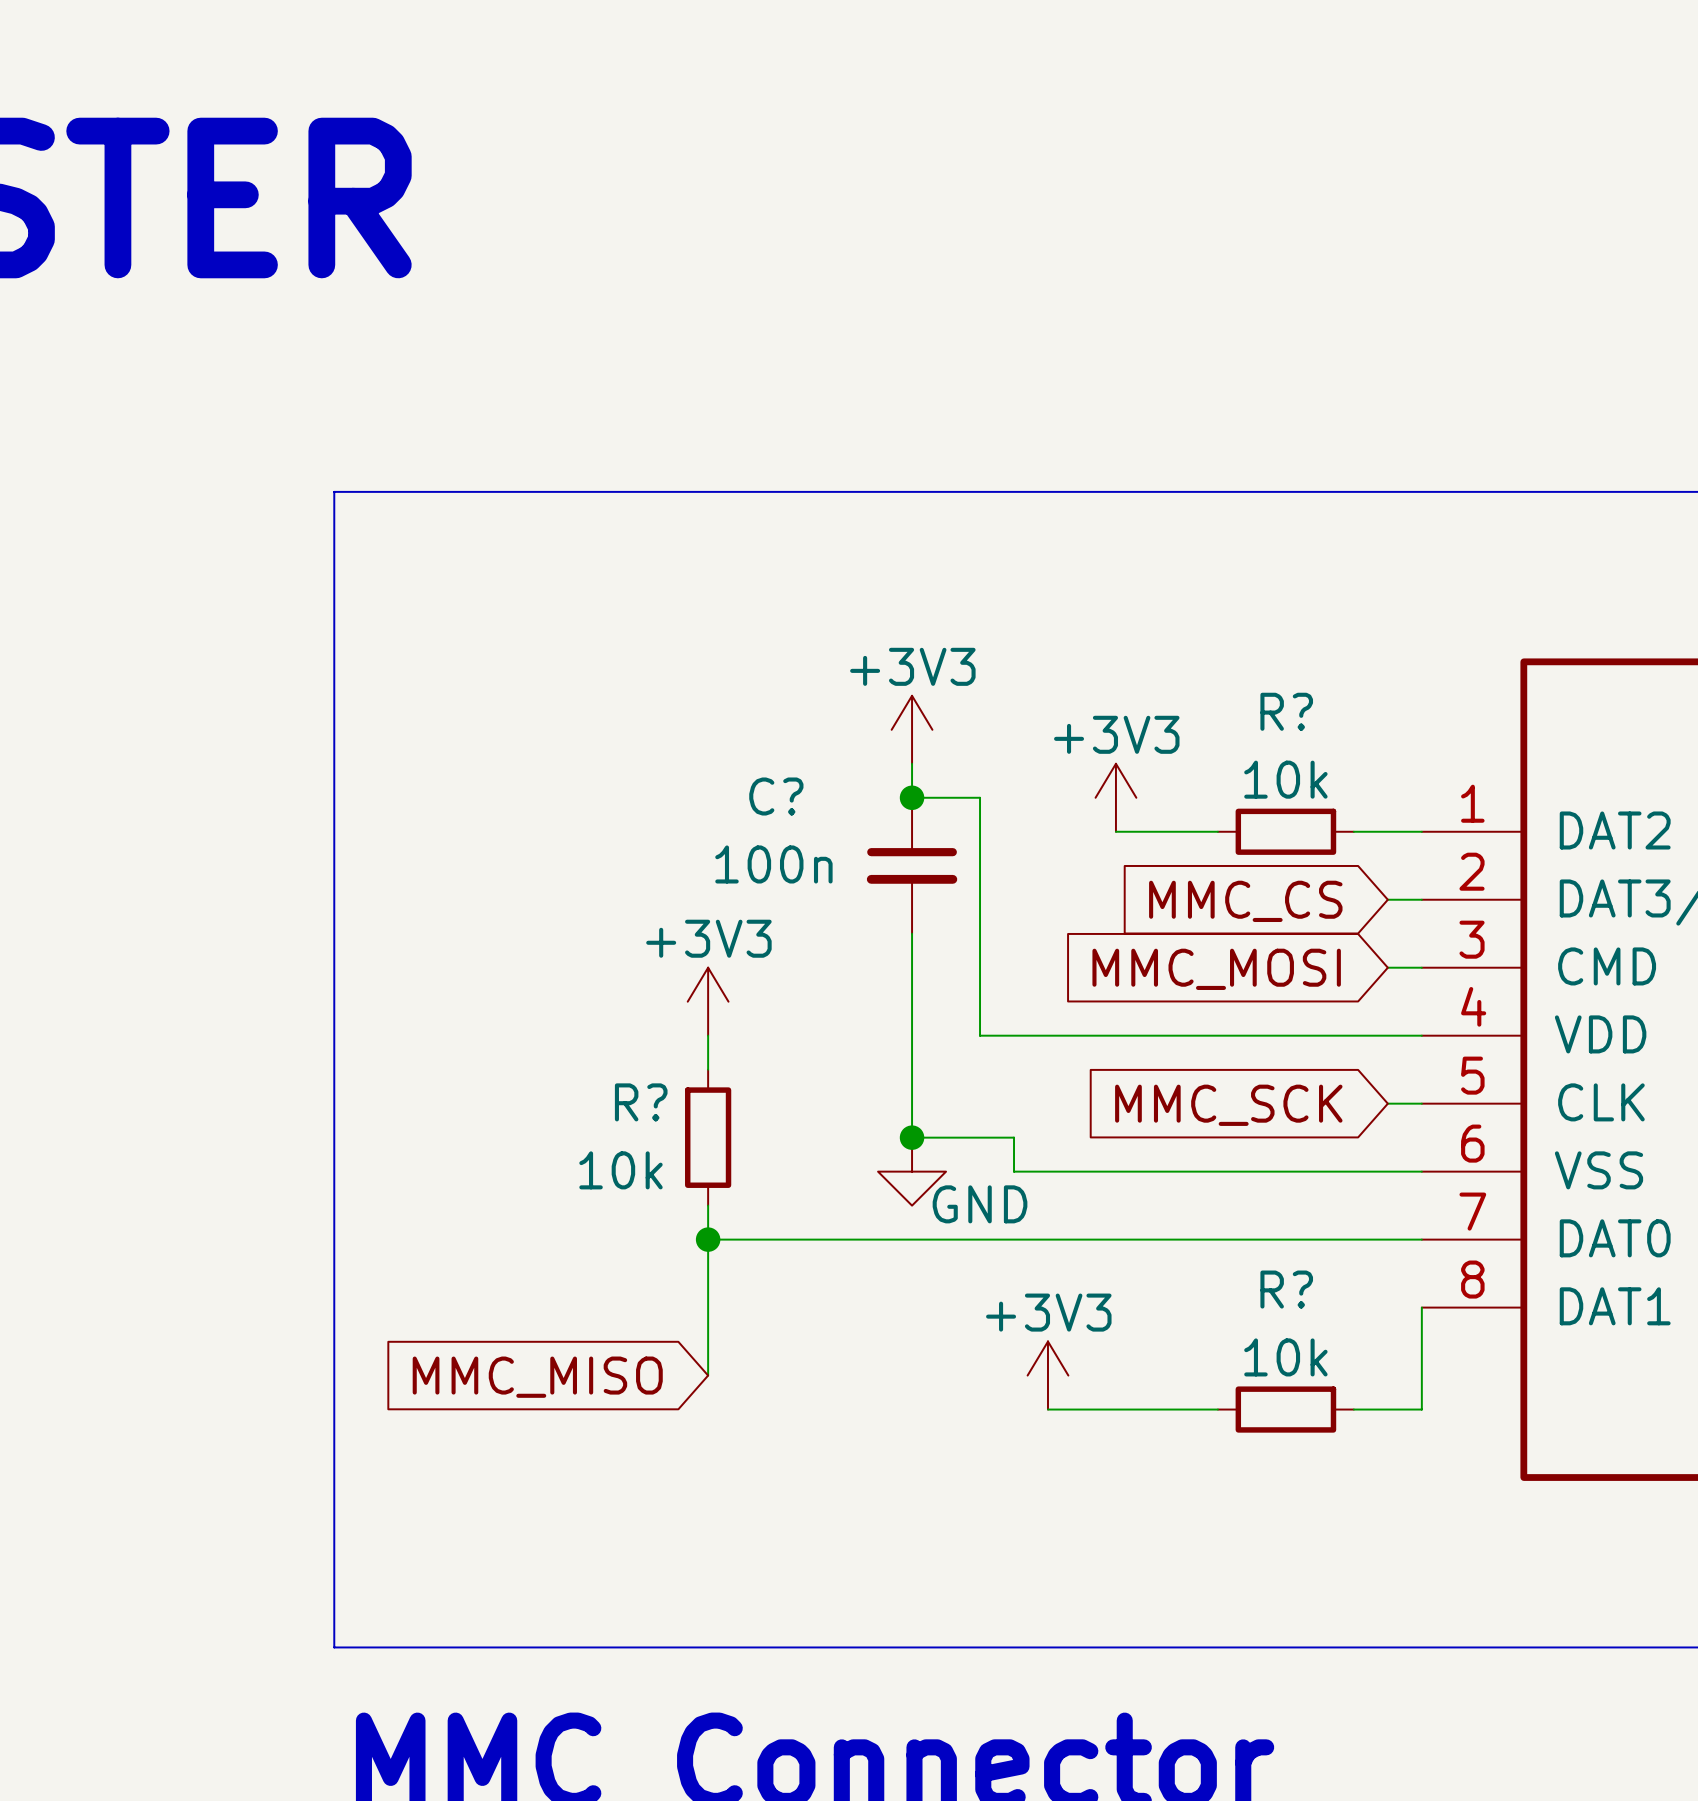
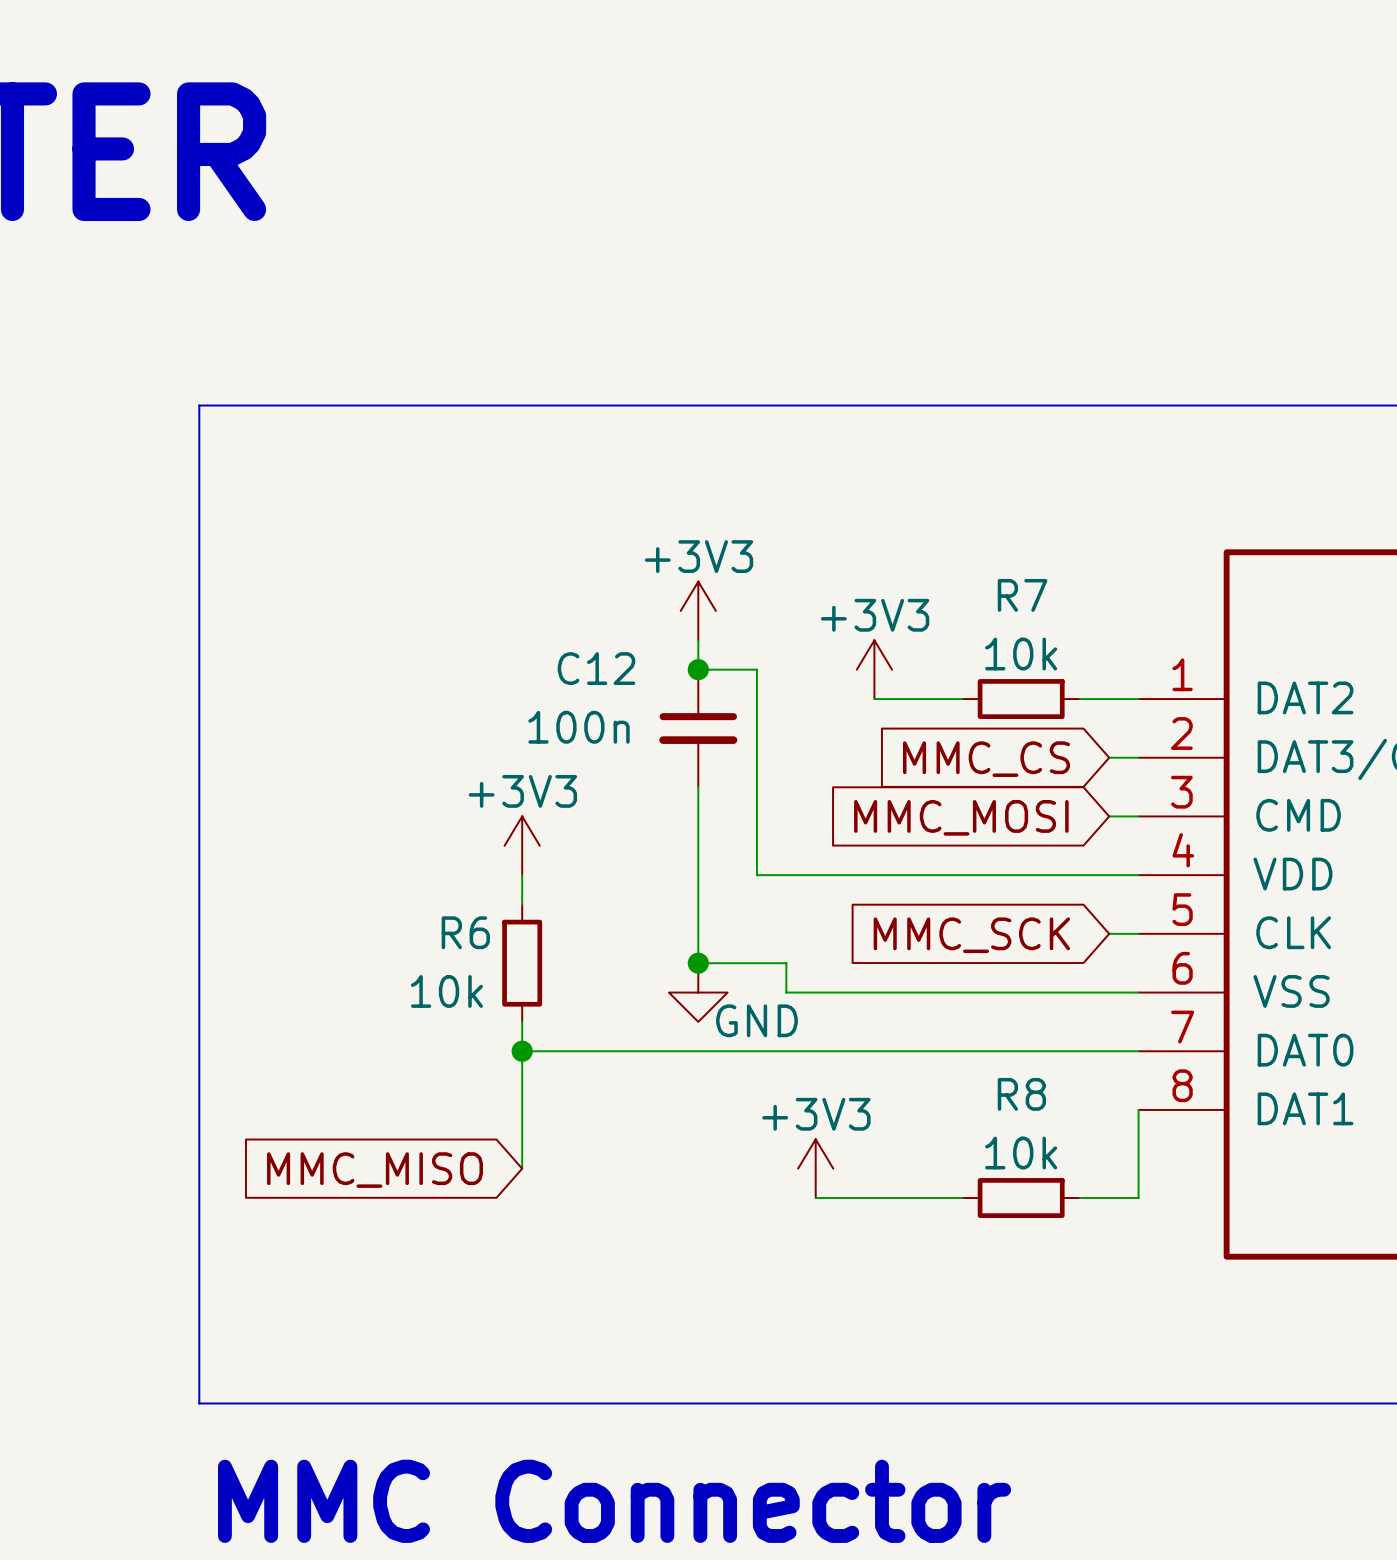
R? name: R? (1286, 711) -> R7 (1022, 595)
C? name: C? (776, 796) -> C12 (596, 668)
R? name: R? (641, 1102) -> R6 (465, 932)
R? name: R? (1286, 1289) -> R8 (1021, 1094)

